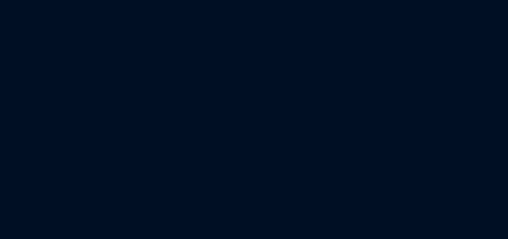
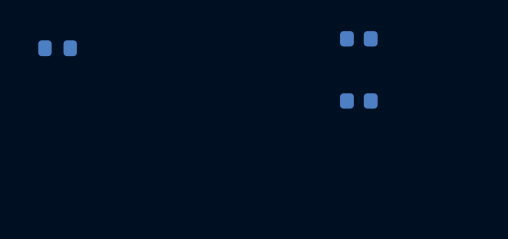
part: none -> (358, 38)
part: none -> (57, 48)
part: none -> (358, 100)

